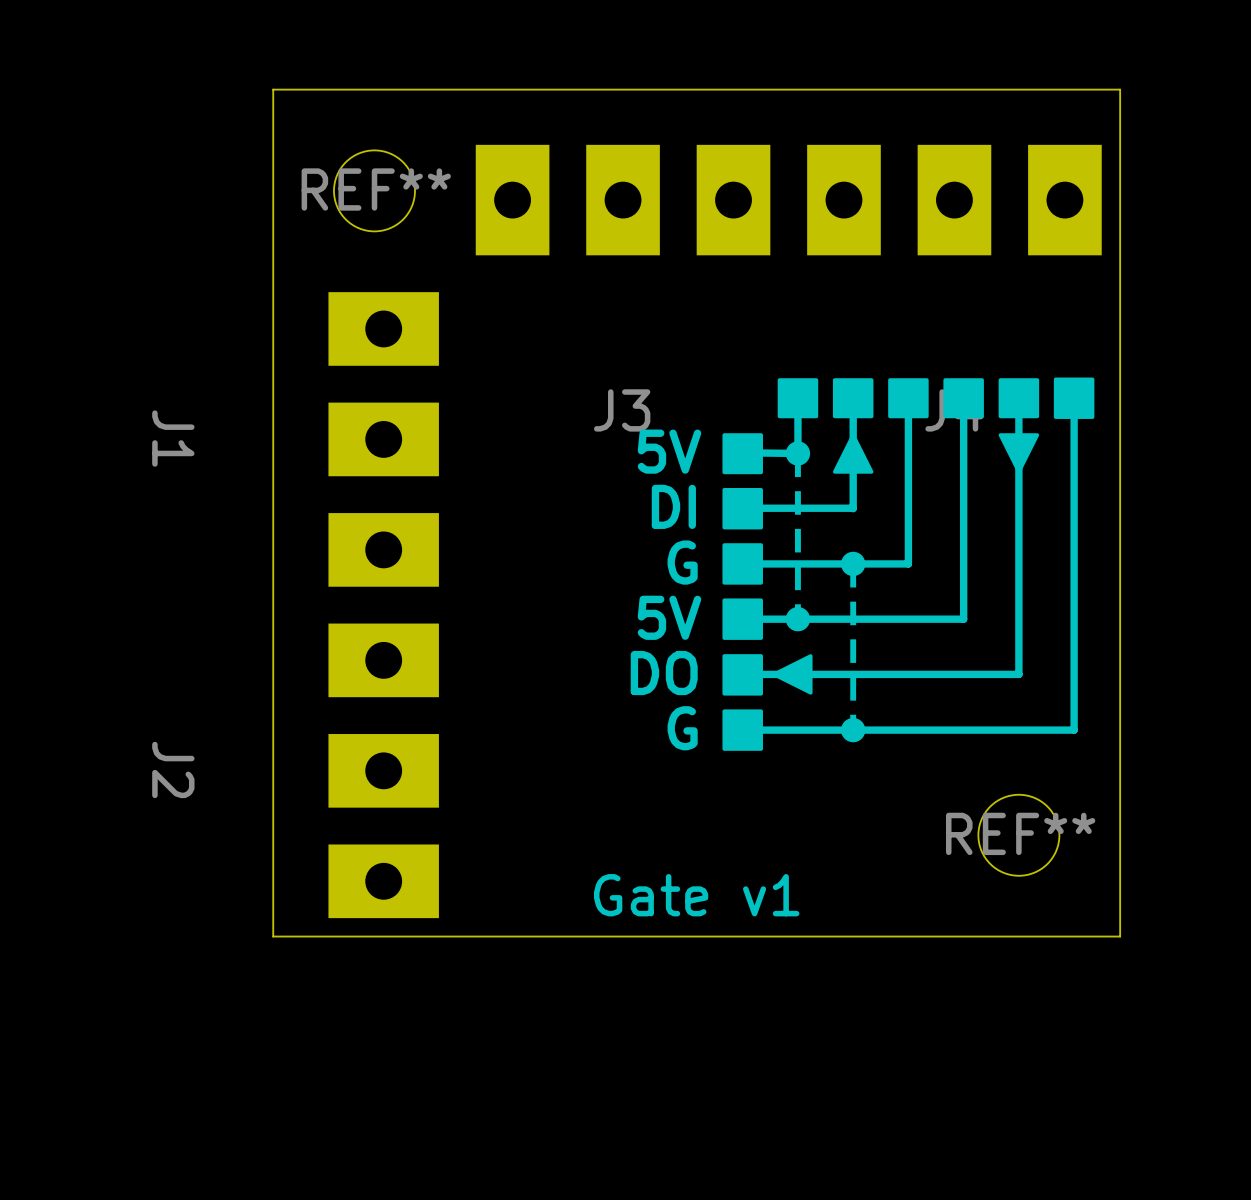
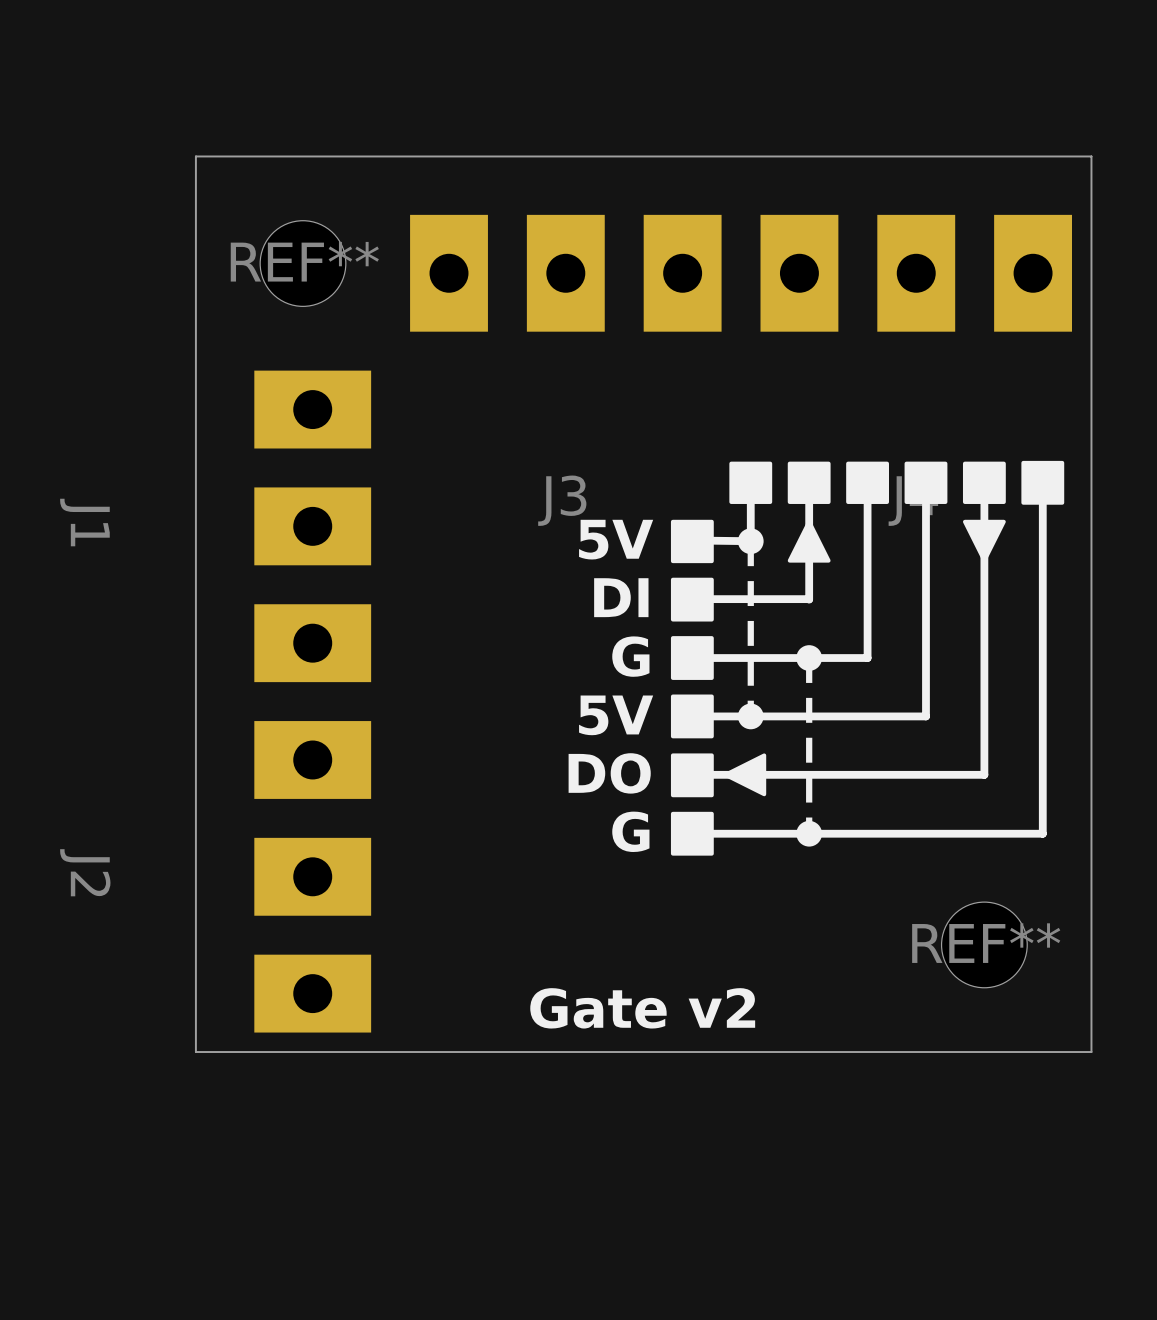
text: Gate v1 (696, 895) -> Gate v2 (642, 1008)

